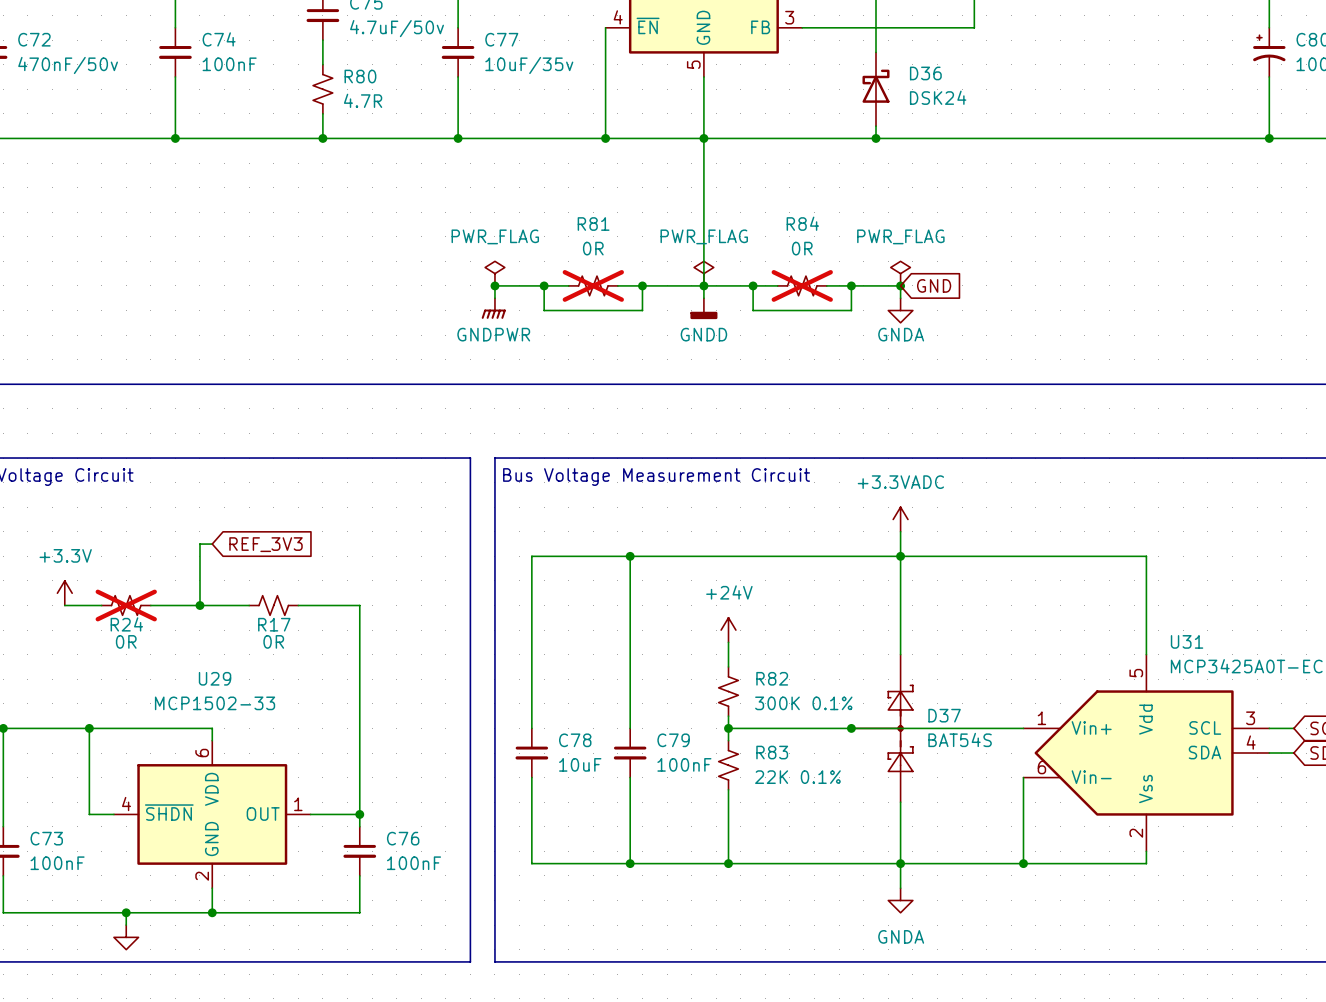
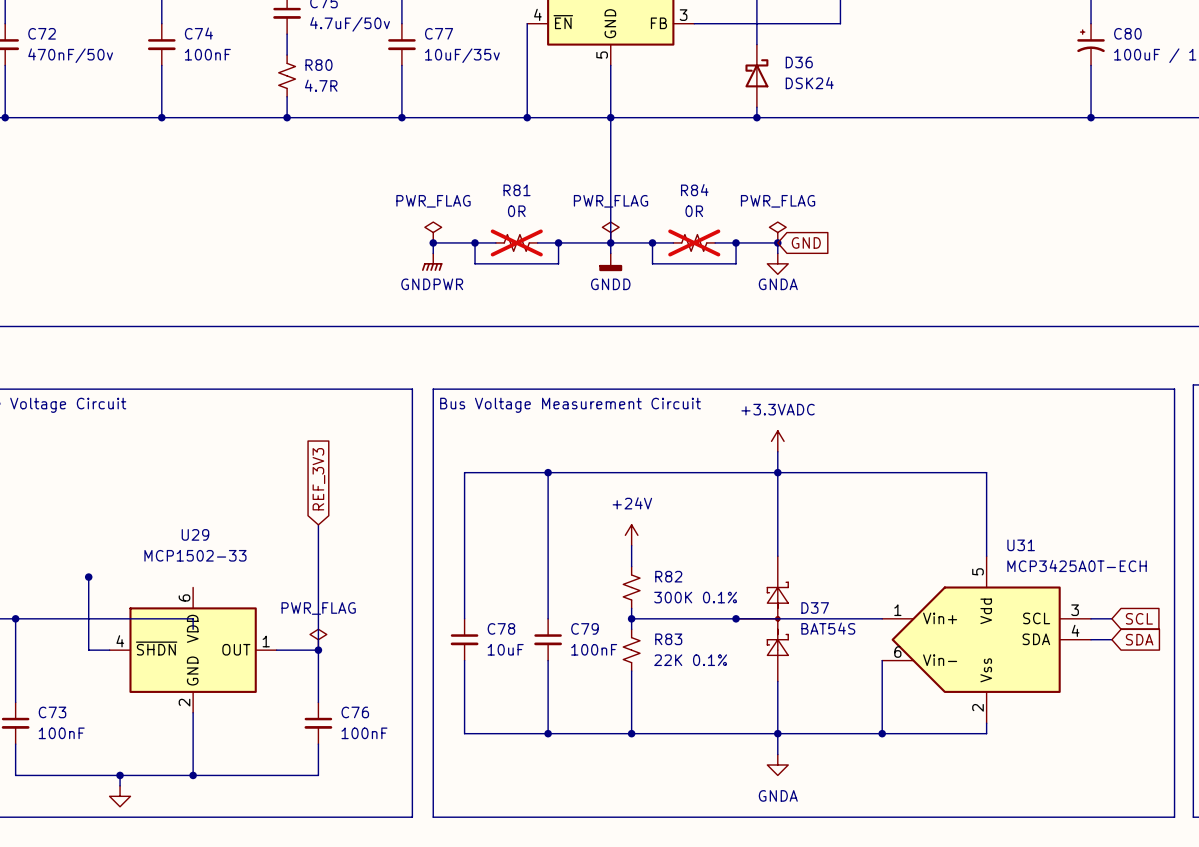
wire: (212, 544) (199, 544) (199, 605) -> none
global label rotation: 0° (266, 544) -> 90° counterclockwise (318, 479)
power symbol: +3.3V (64, 593) -> none
wire: (64, 605) (101, 605) -> none
R24: 0R (126, 605) -> none
wire: (150, 605) (249, 605) -> none
junction: (199, 605) -> none
R17: 0R (273, 605) -> none
wire: (298, 605) (359, 605) (359, 617) -> none
wire: none -> (88, 577) (88, 618)
junction position: (89, 728) -> (88, 577)
power symbol: none -> PWR_FLAG (318, 639)
wire: (89, 765) (89, 814) (113, 814) -> (88, 650) (109, 650)
U29 position: (212, 814) -> (193, 650)
wire: (310, 814) (359, 814) -> (276, 650) (318, 650)
junction position: (359, 814) -> (318, 650)

